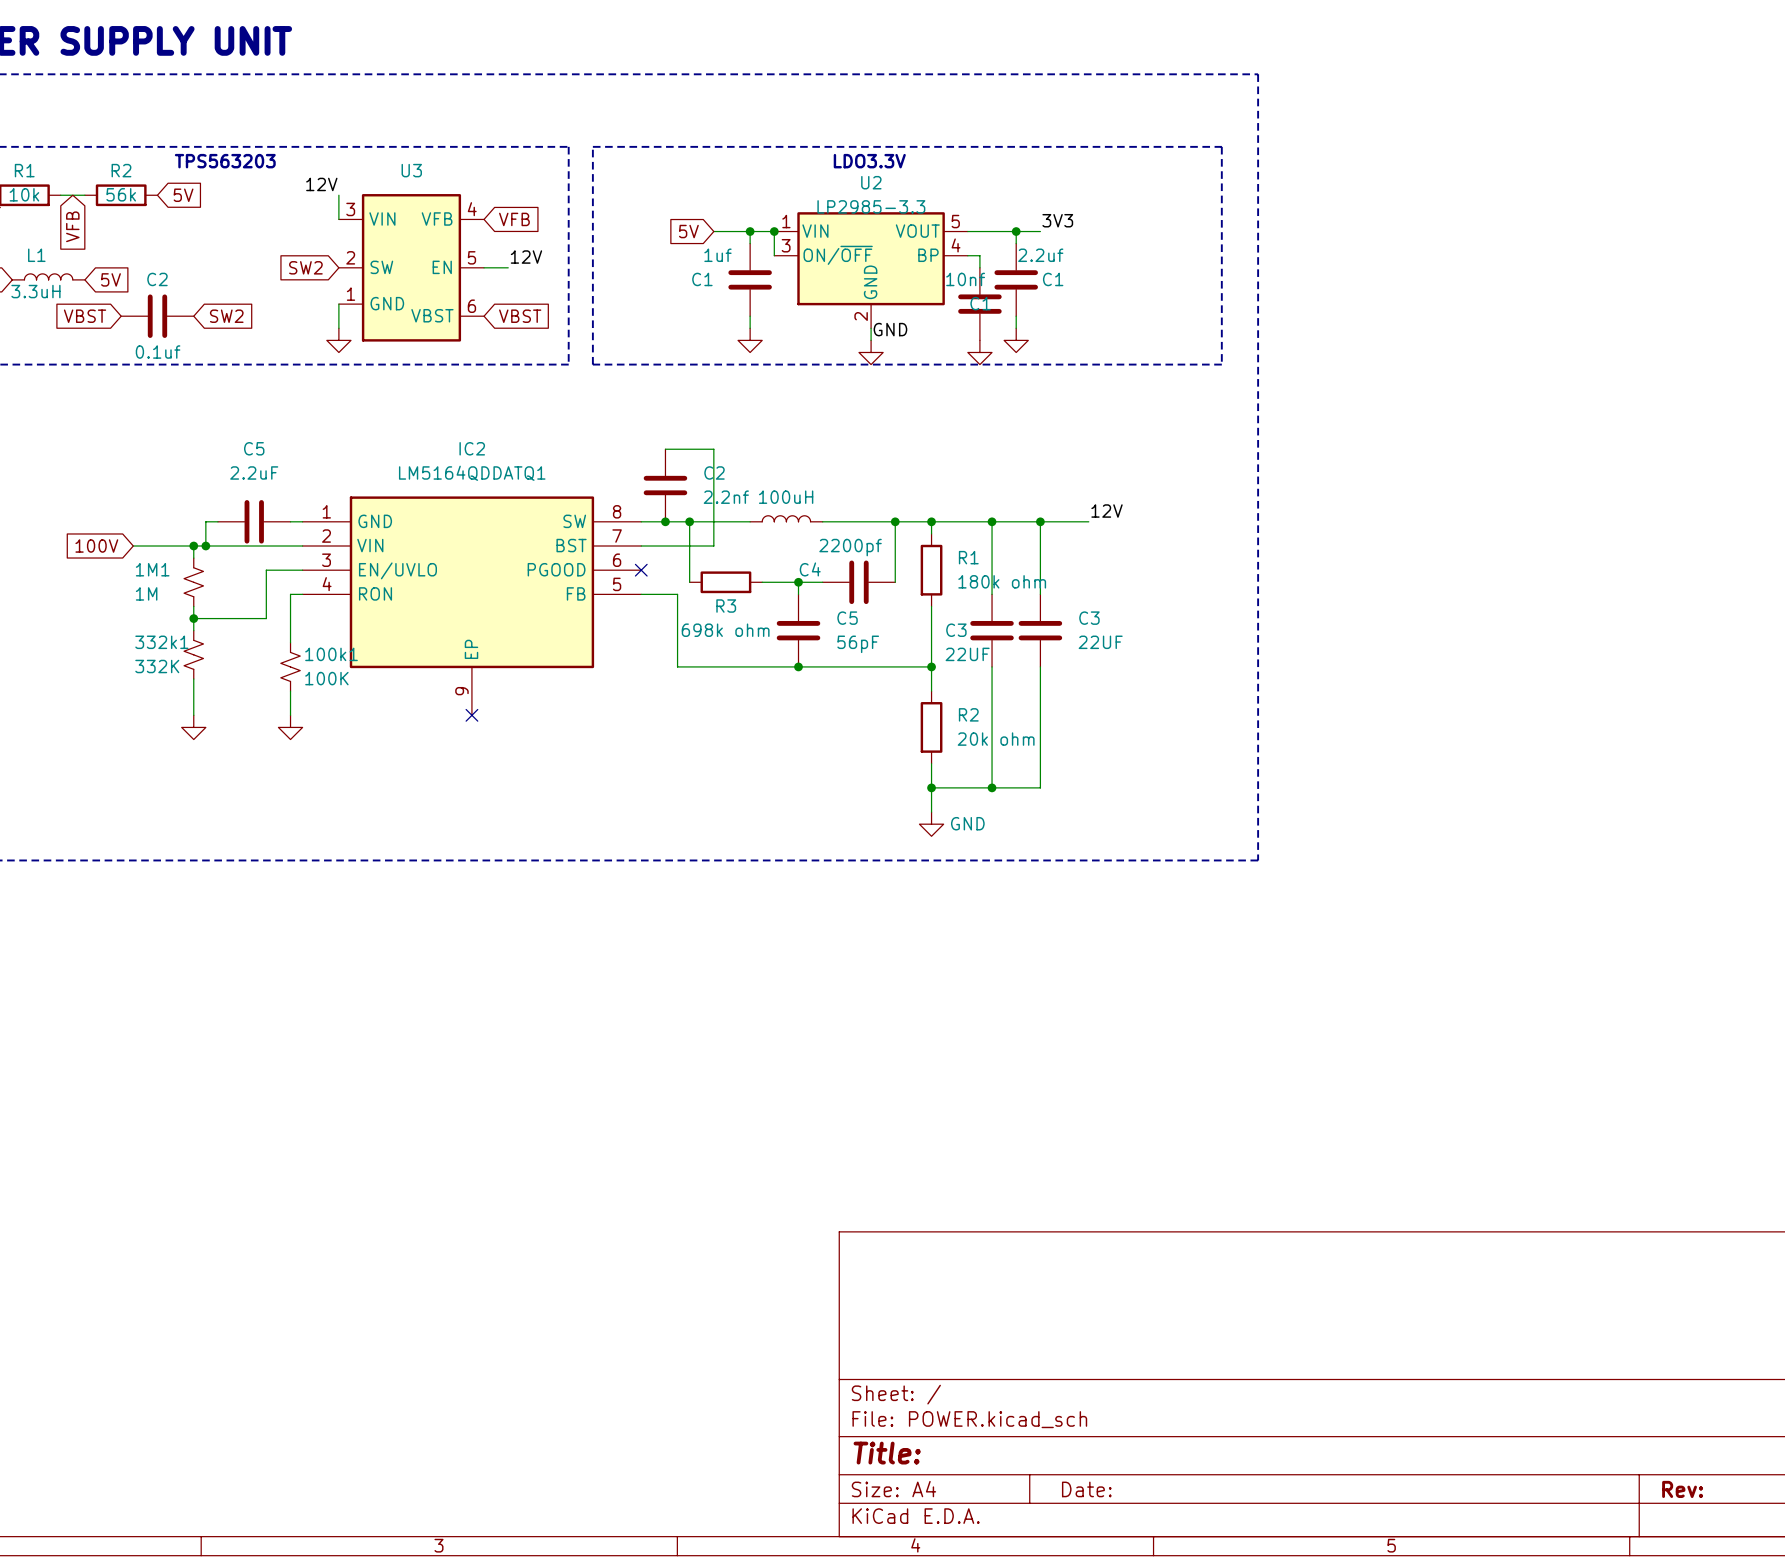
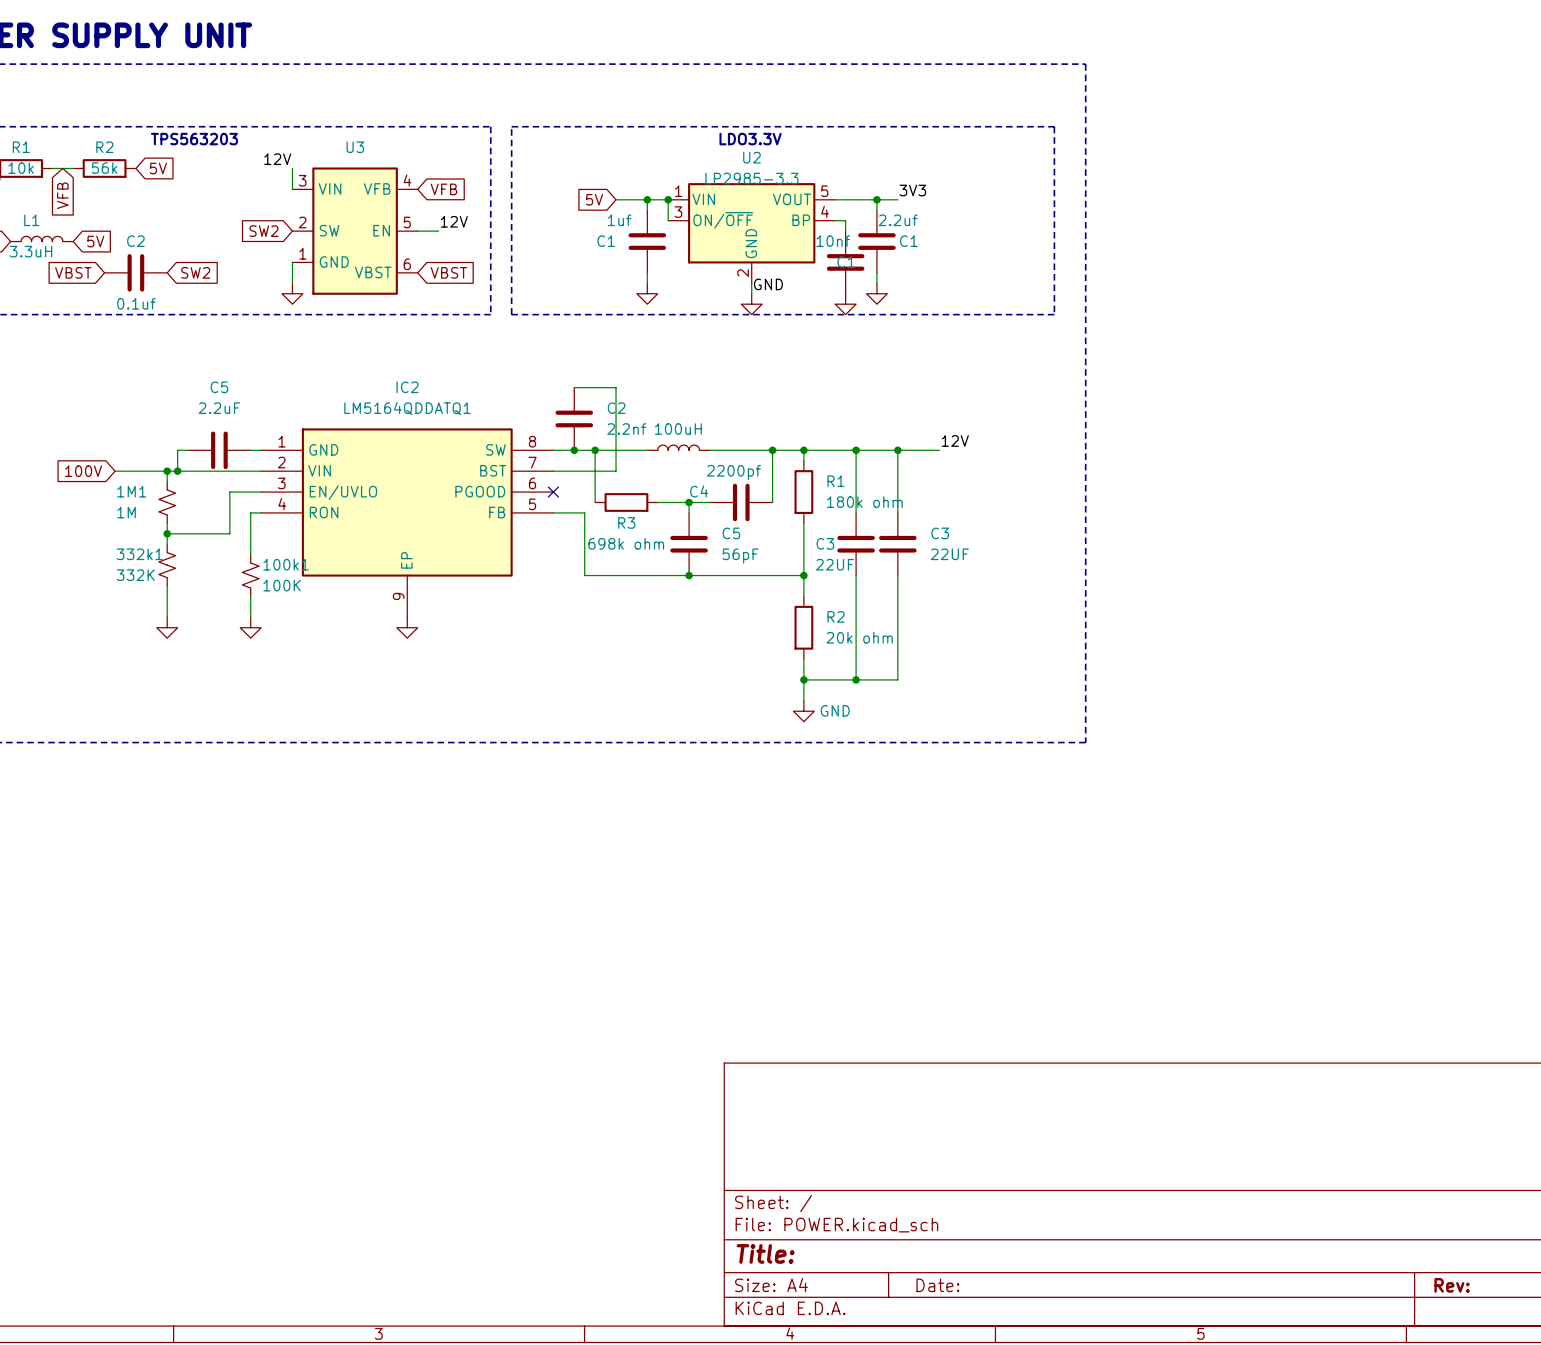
no-connect mark: (471, 715) -> none
power symbol: none -> (407, 627)

